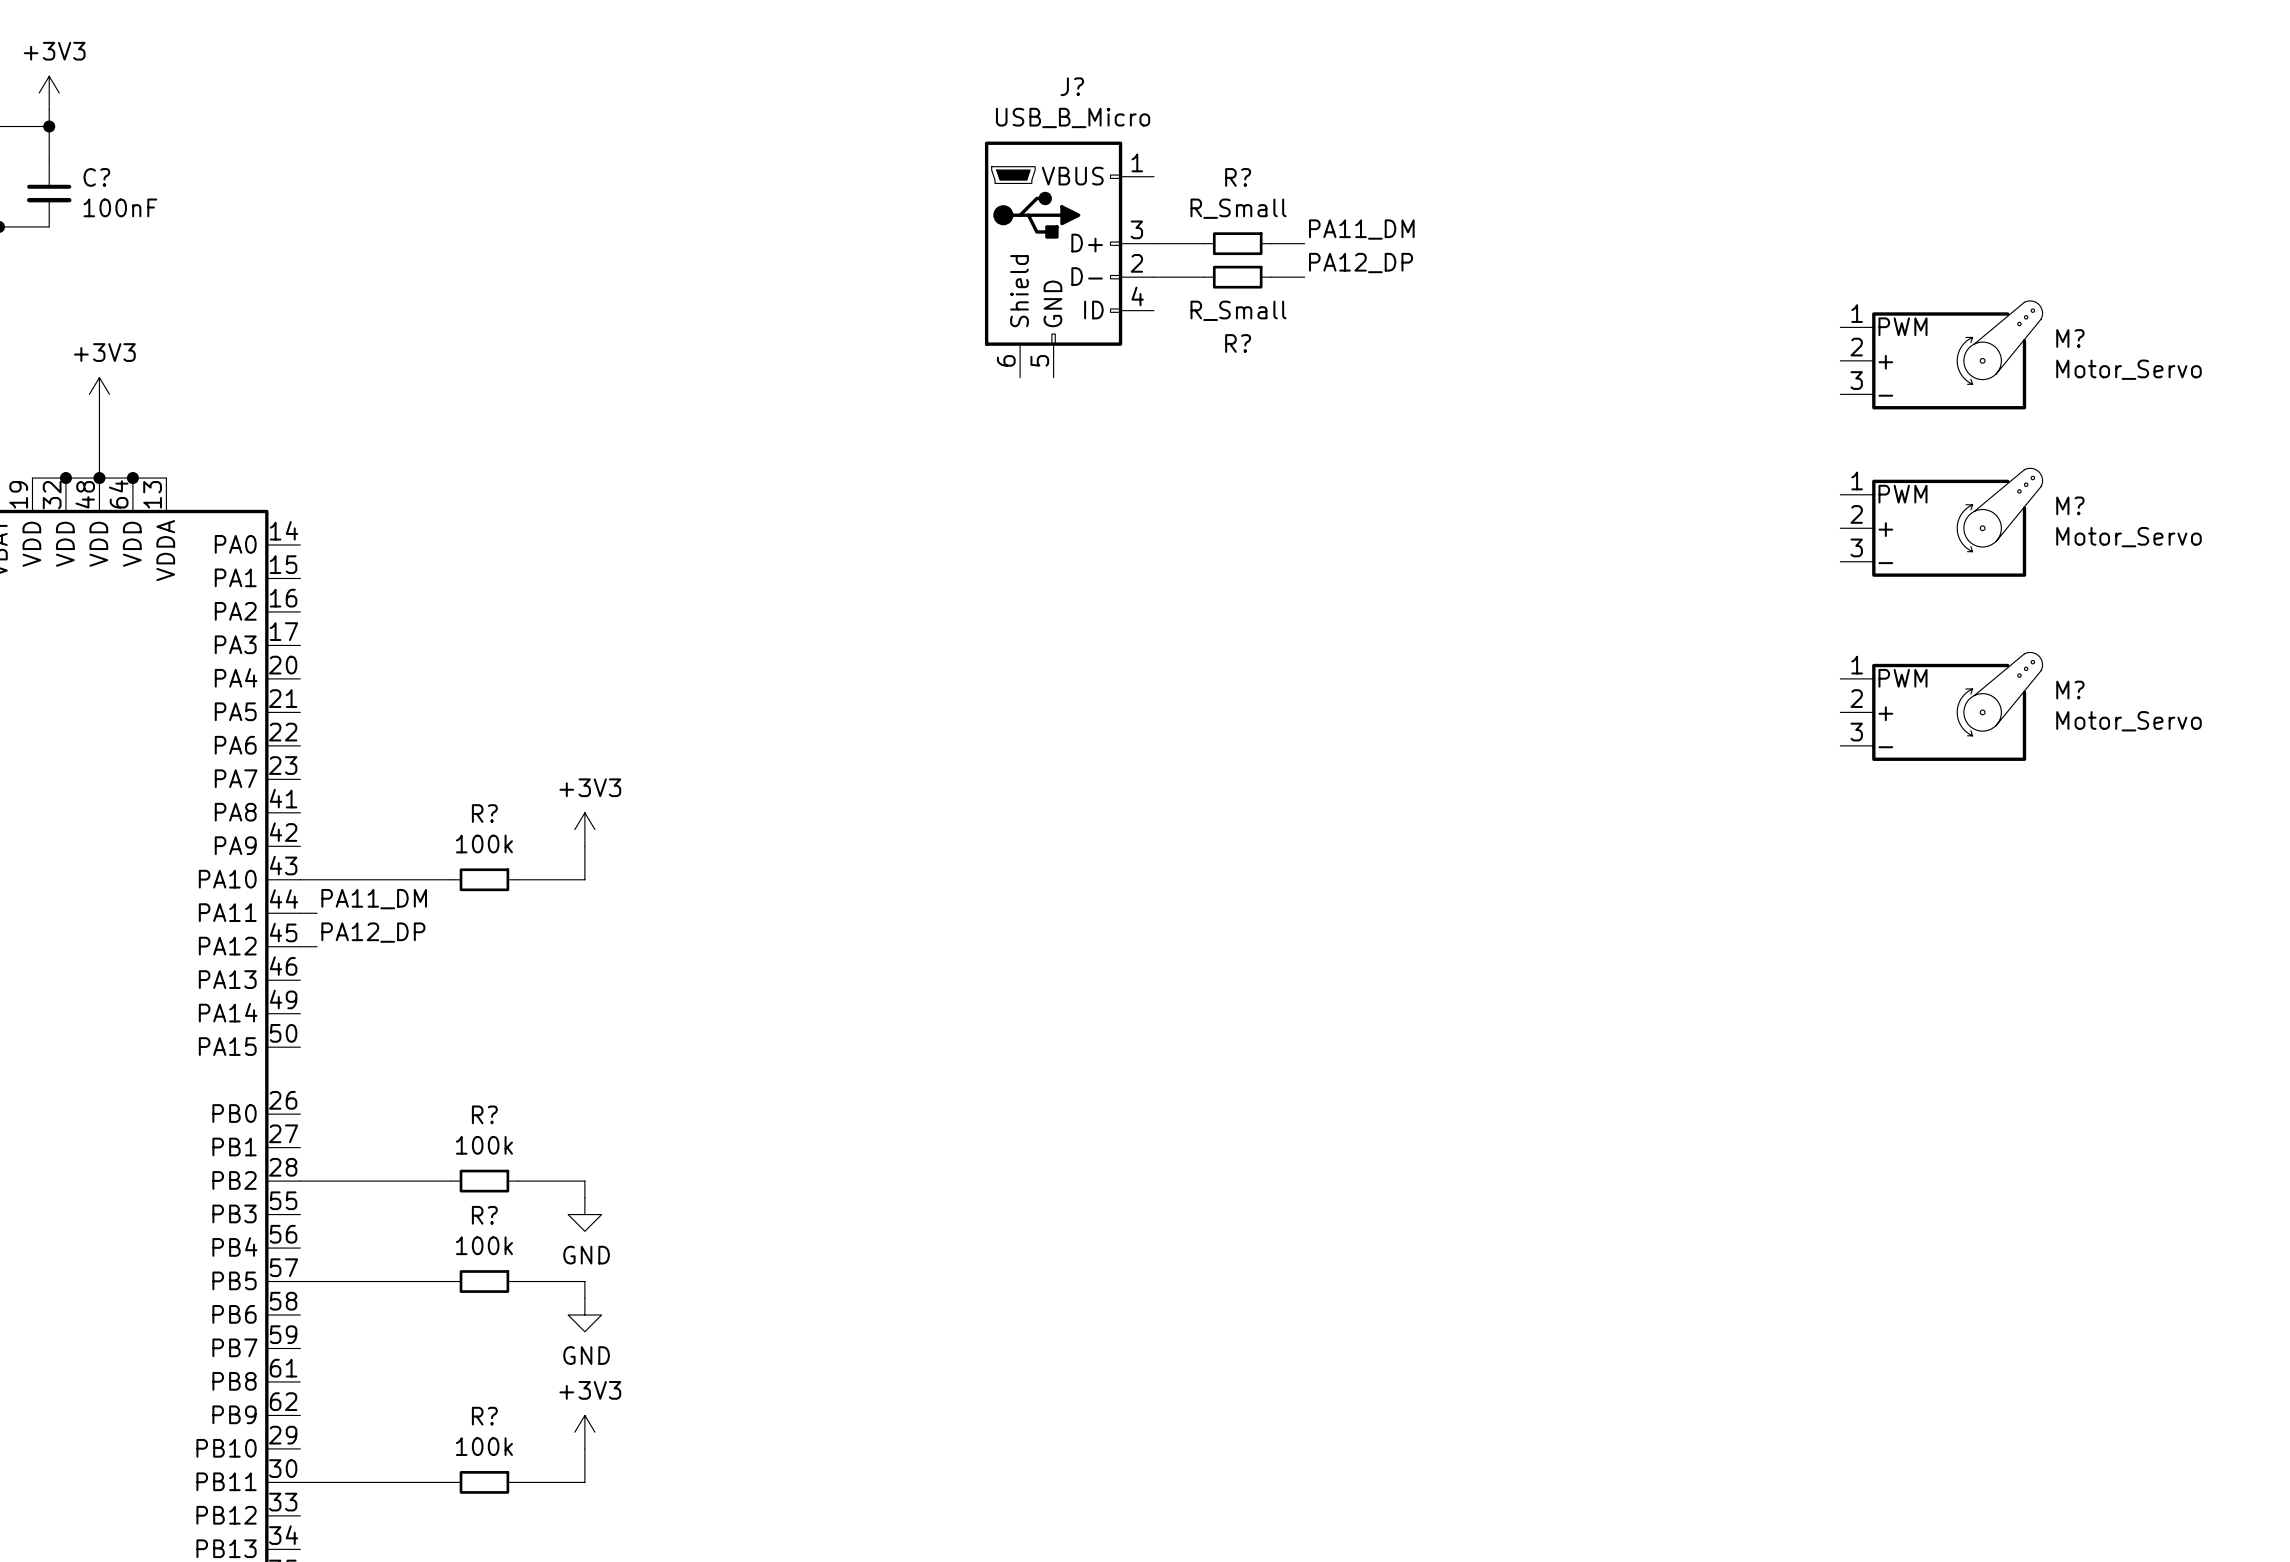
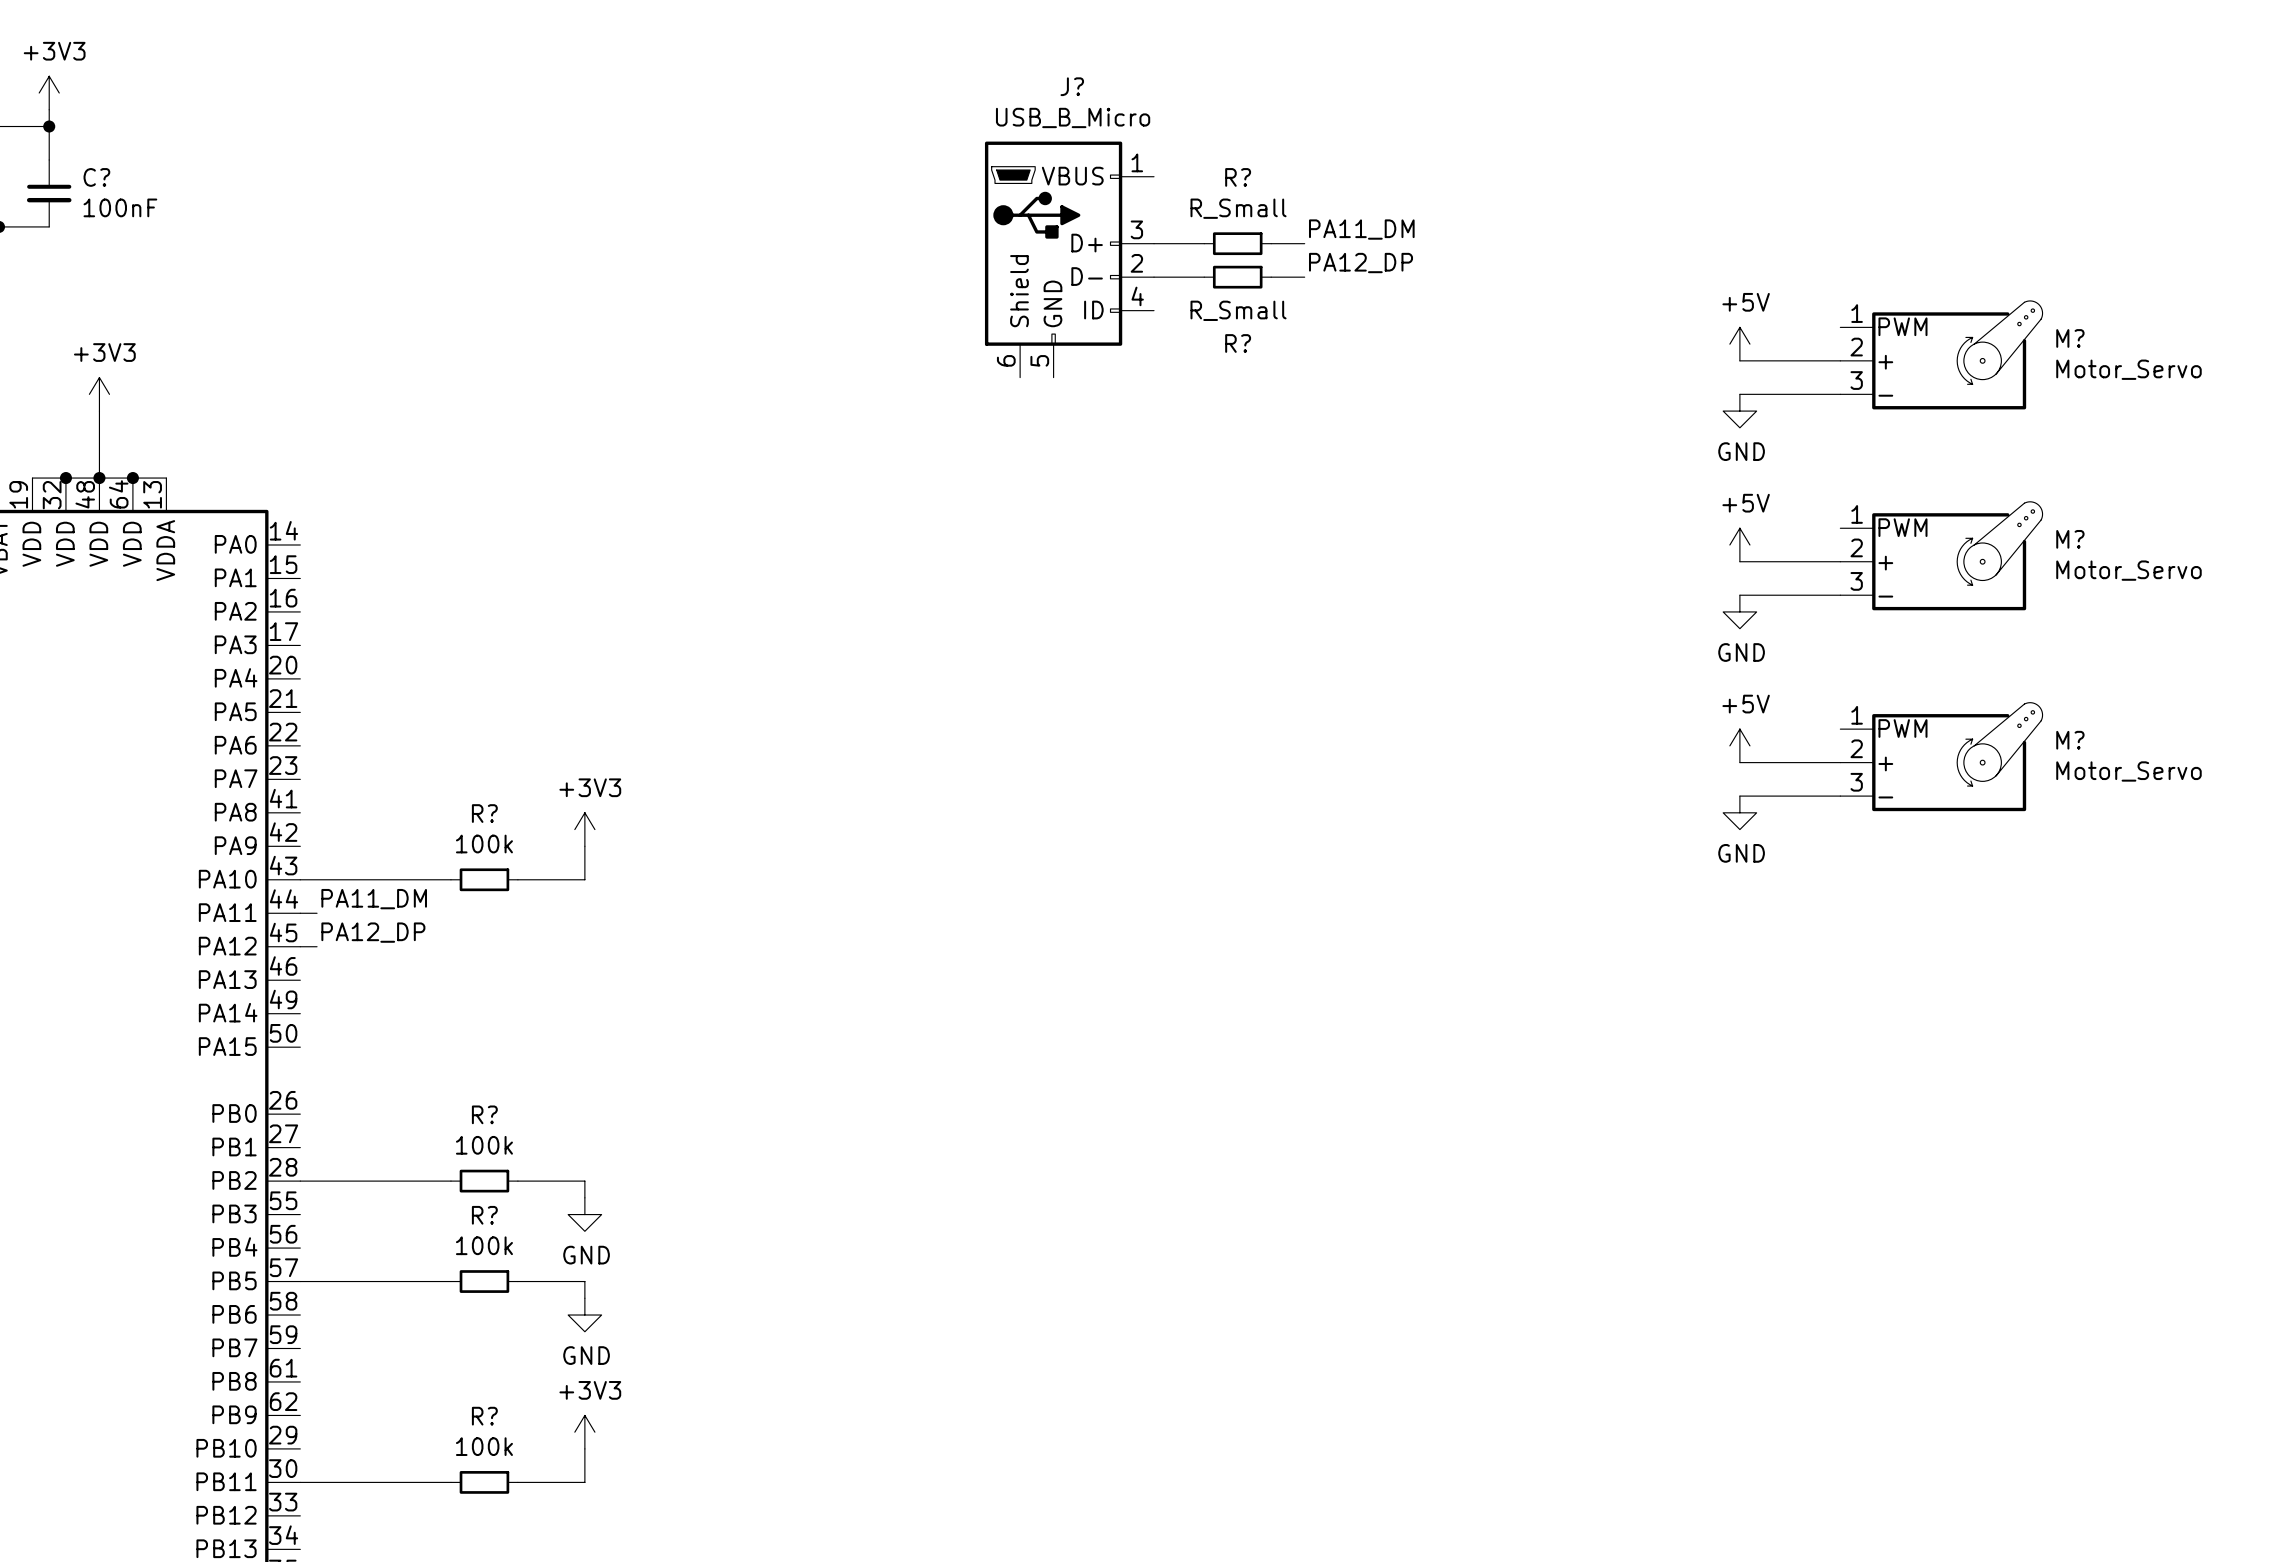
power symbol: none -> +5V (1739, 344)
wire: none -> (1739, 360) (1840, 360)
wire: none -> (1739, 394) (1840, 394)
power symbol: none -> GND (1739, 411)
M? position: (1941, 522) -> (1941, 556)
power symbol: none -> +5V (1739, 544)
wire: none -> (1739, 561) (1840, 561)
wire: none -> (1739, 595) (1840, 595)
power symbol: none -> GND (1739, 611)
M? position: (1941, 706) -> (1941, 756)
power symbol: none -> +5V (1739, 745)
wire: none -> (1739, 762) (1840, 762)
wire: none -> (1739, 796) (1840, 796)
power symbol: none -> GND (1739, 812)

